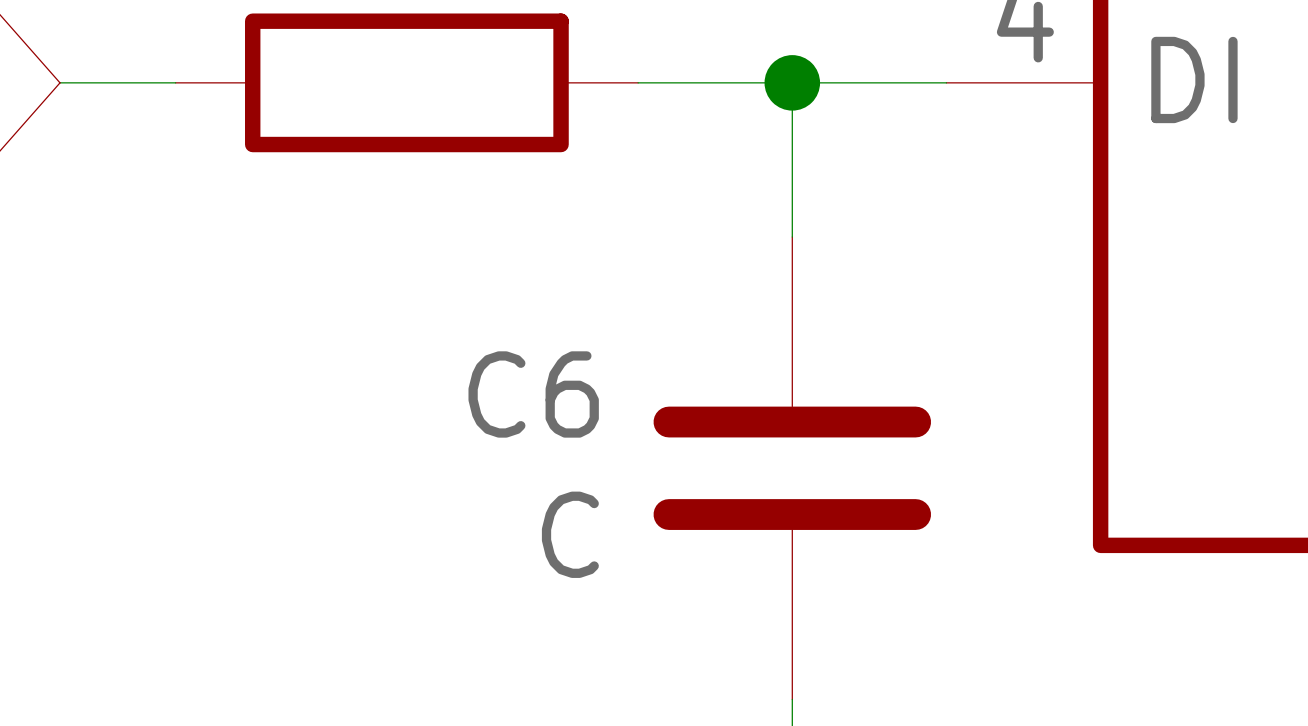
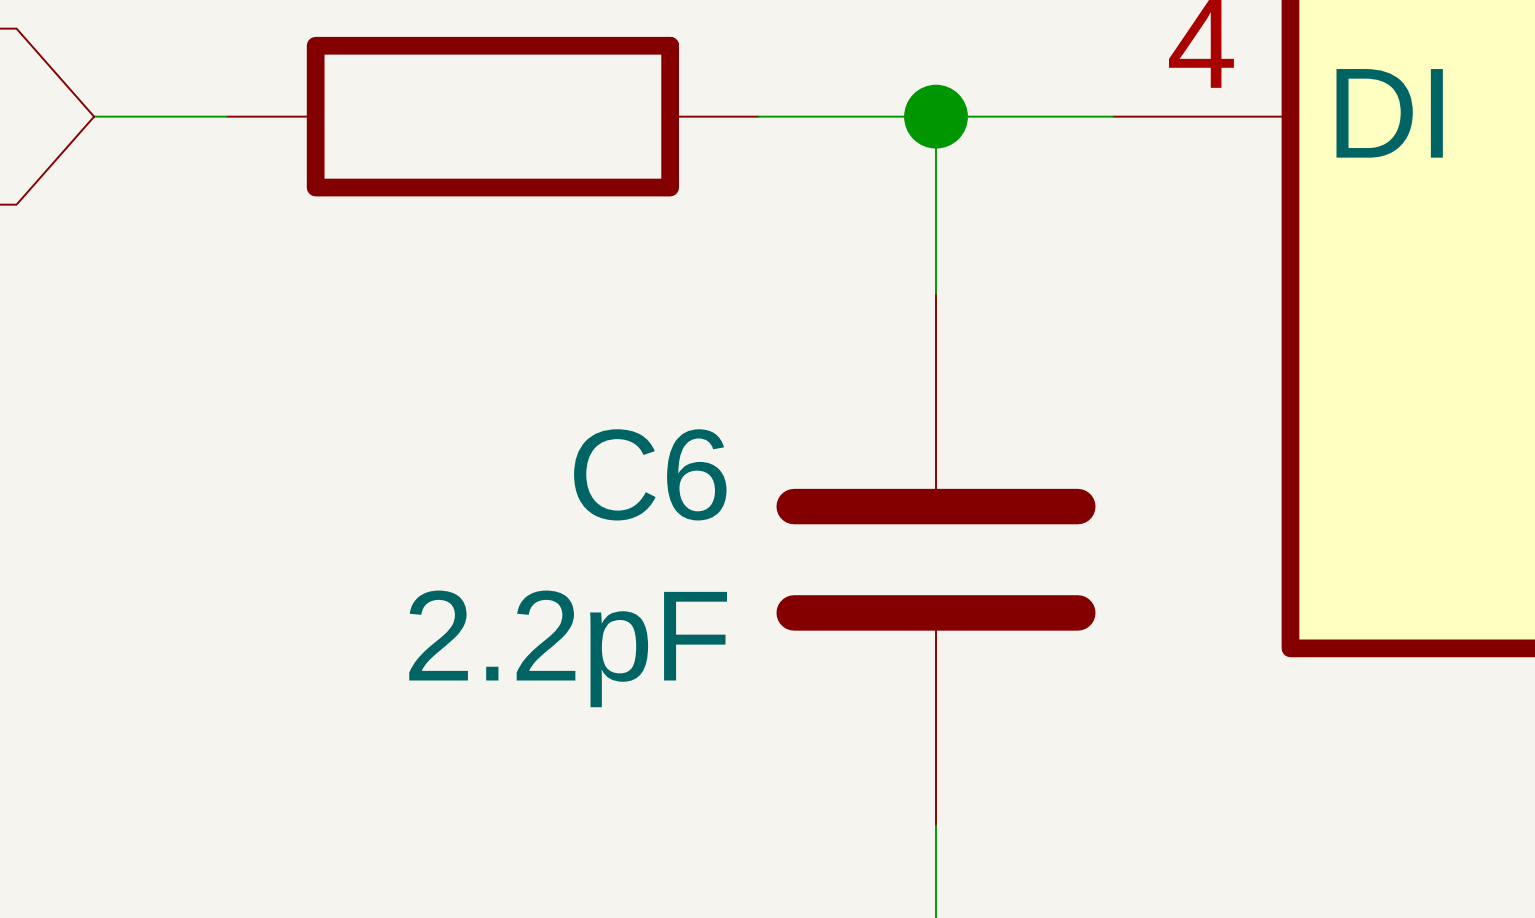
C6 value: C (570, 534) -> 2.2pF (568, 648)

